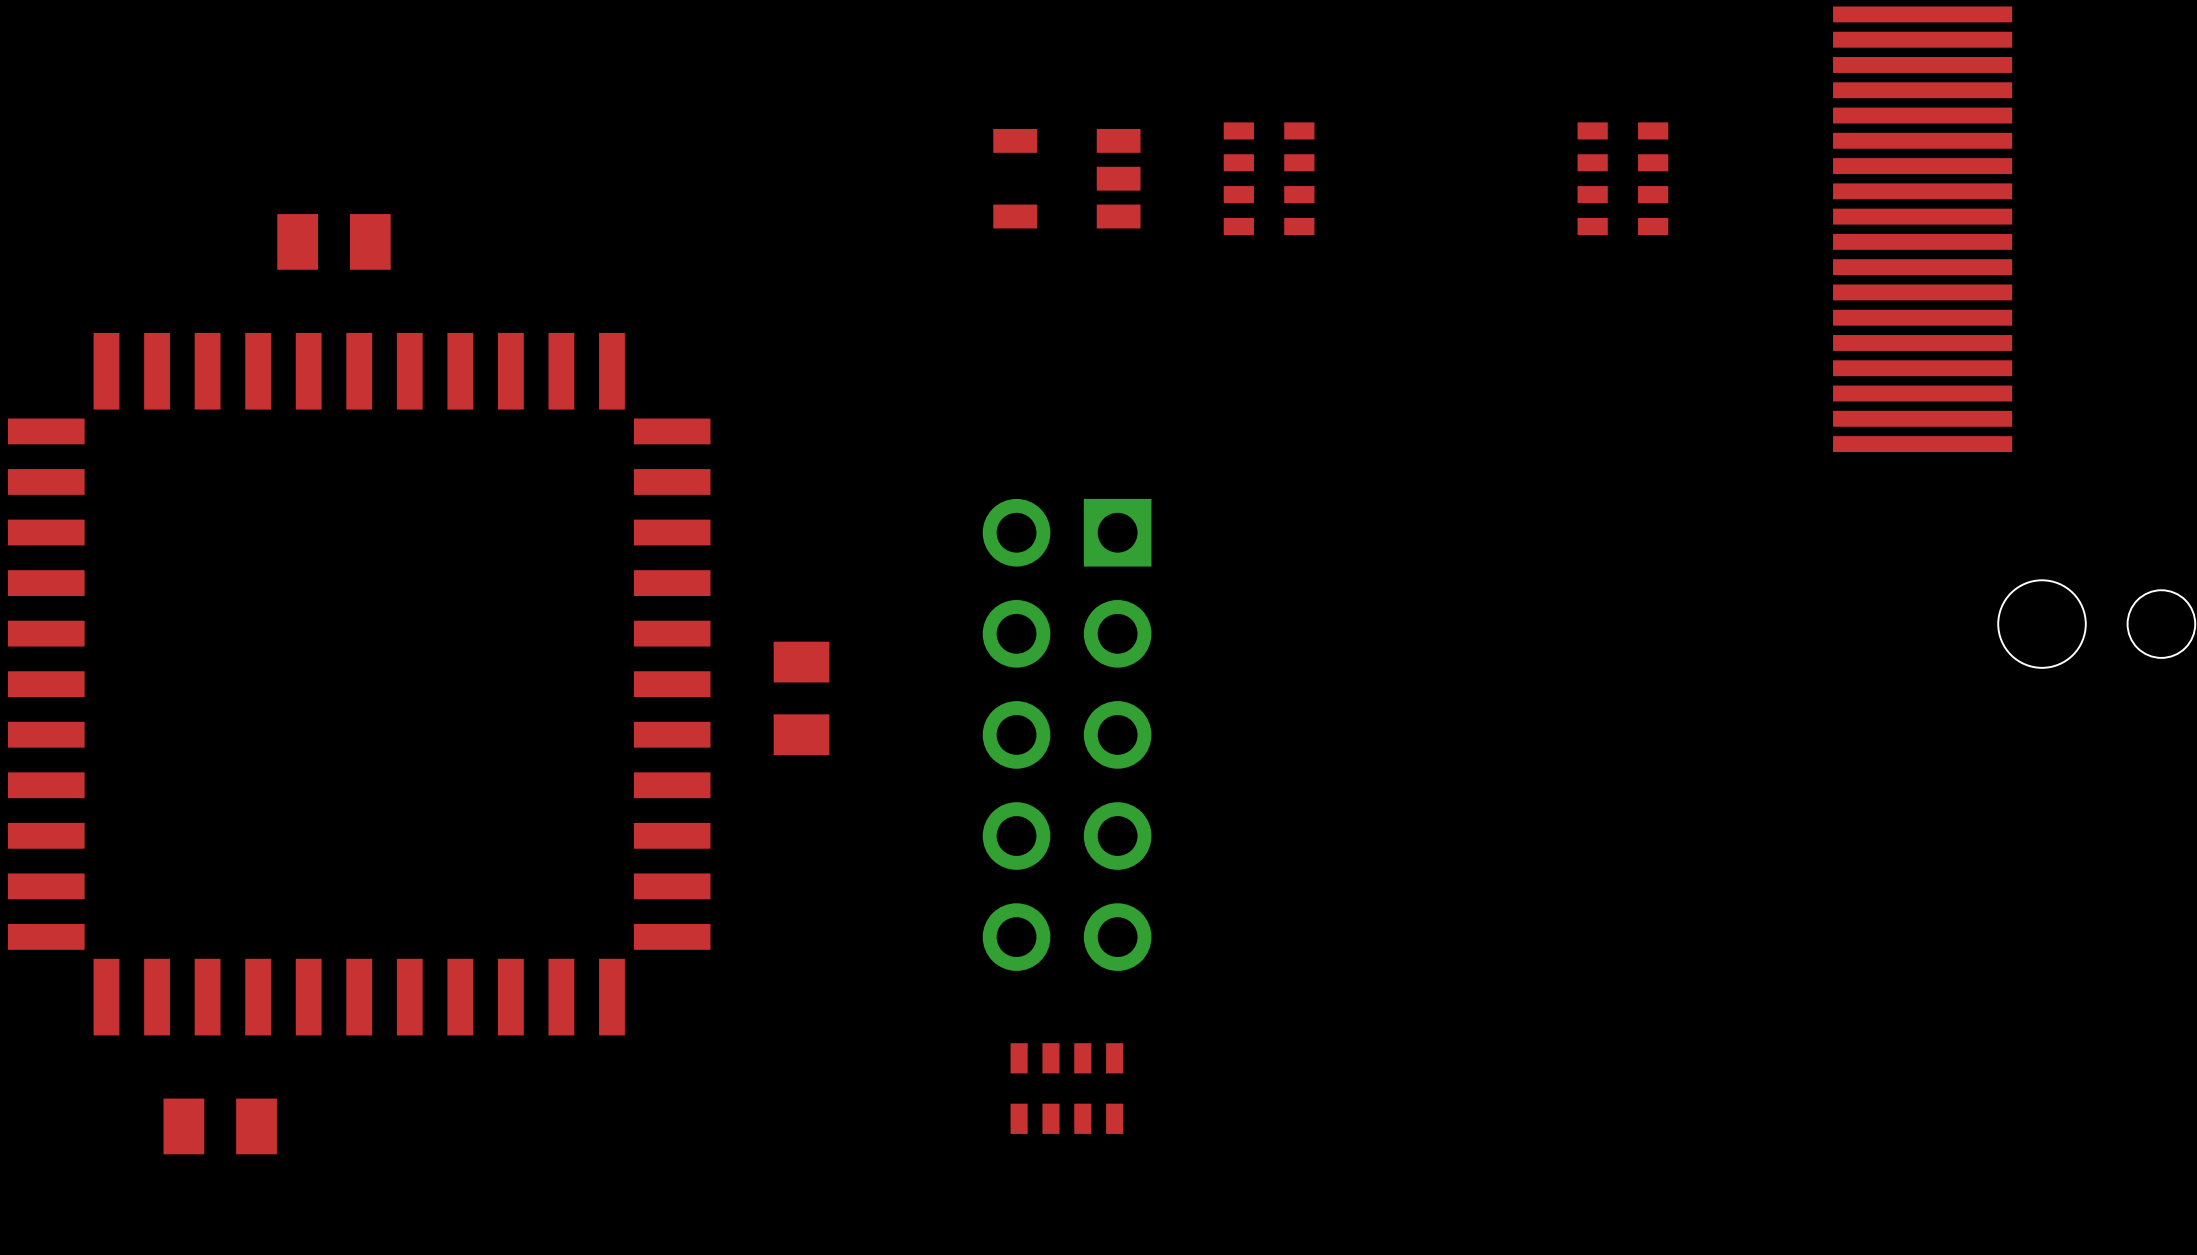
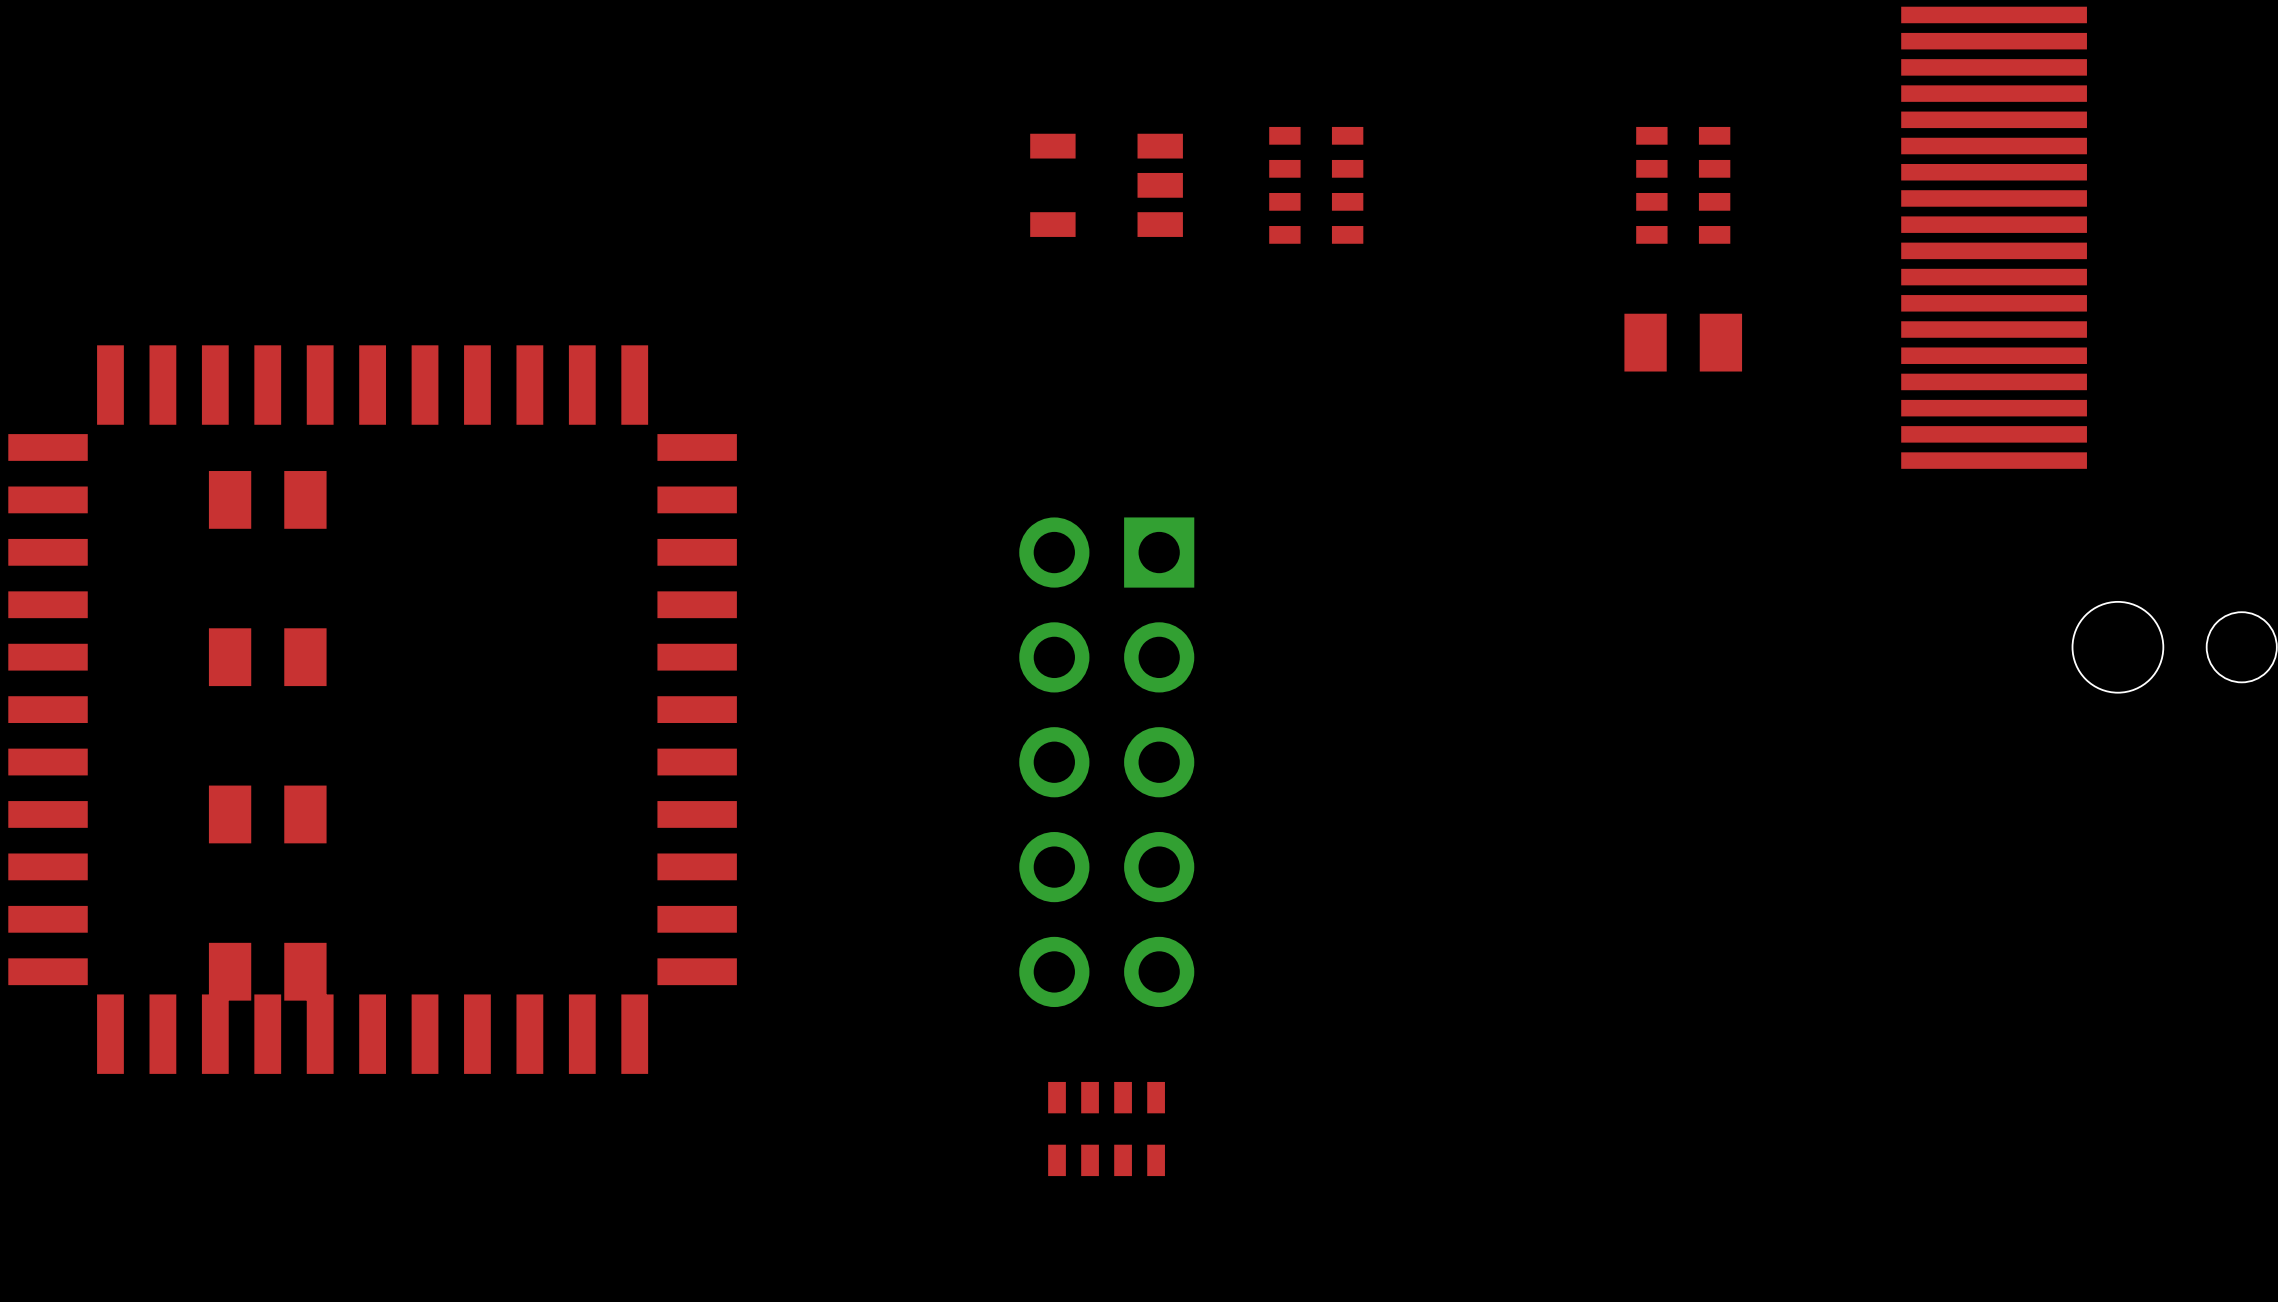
part: (333, 241) -> none
part: none -> (1683, 342)
part: none -> (267, 499)
part: none -> (267, 657)
part: (801, 698) -> none
part: none -> (267, 814)
part: none -> (267, 971)
part: (220, 1126) -> none

